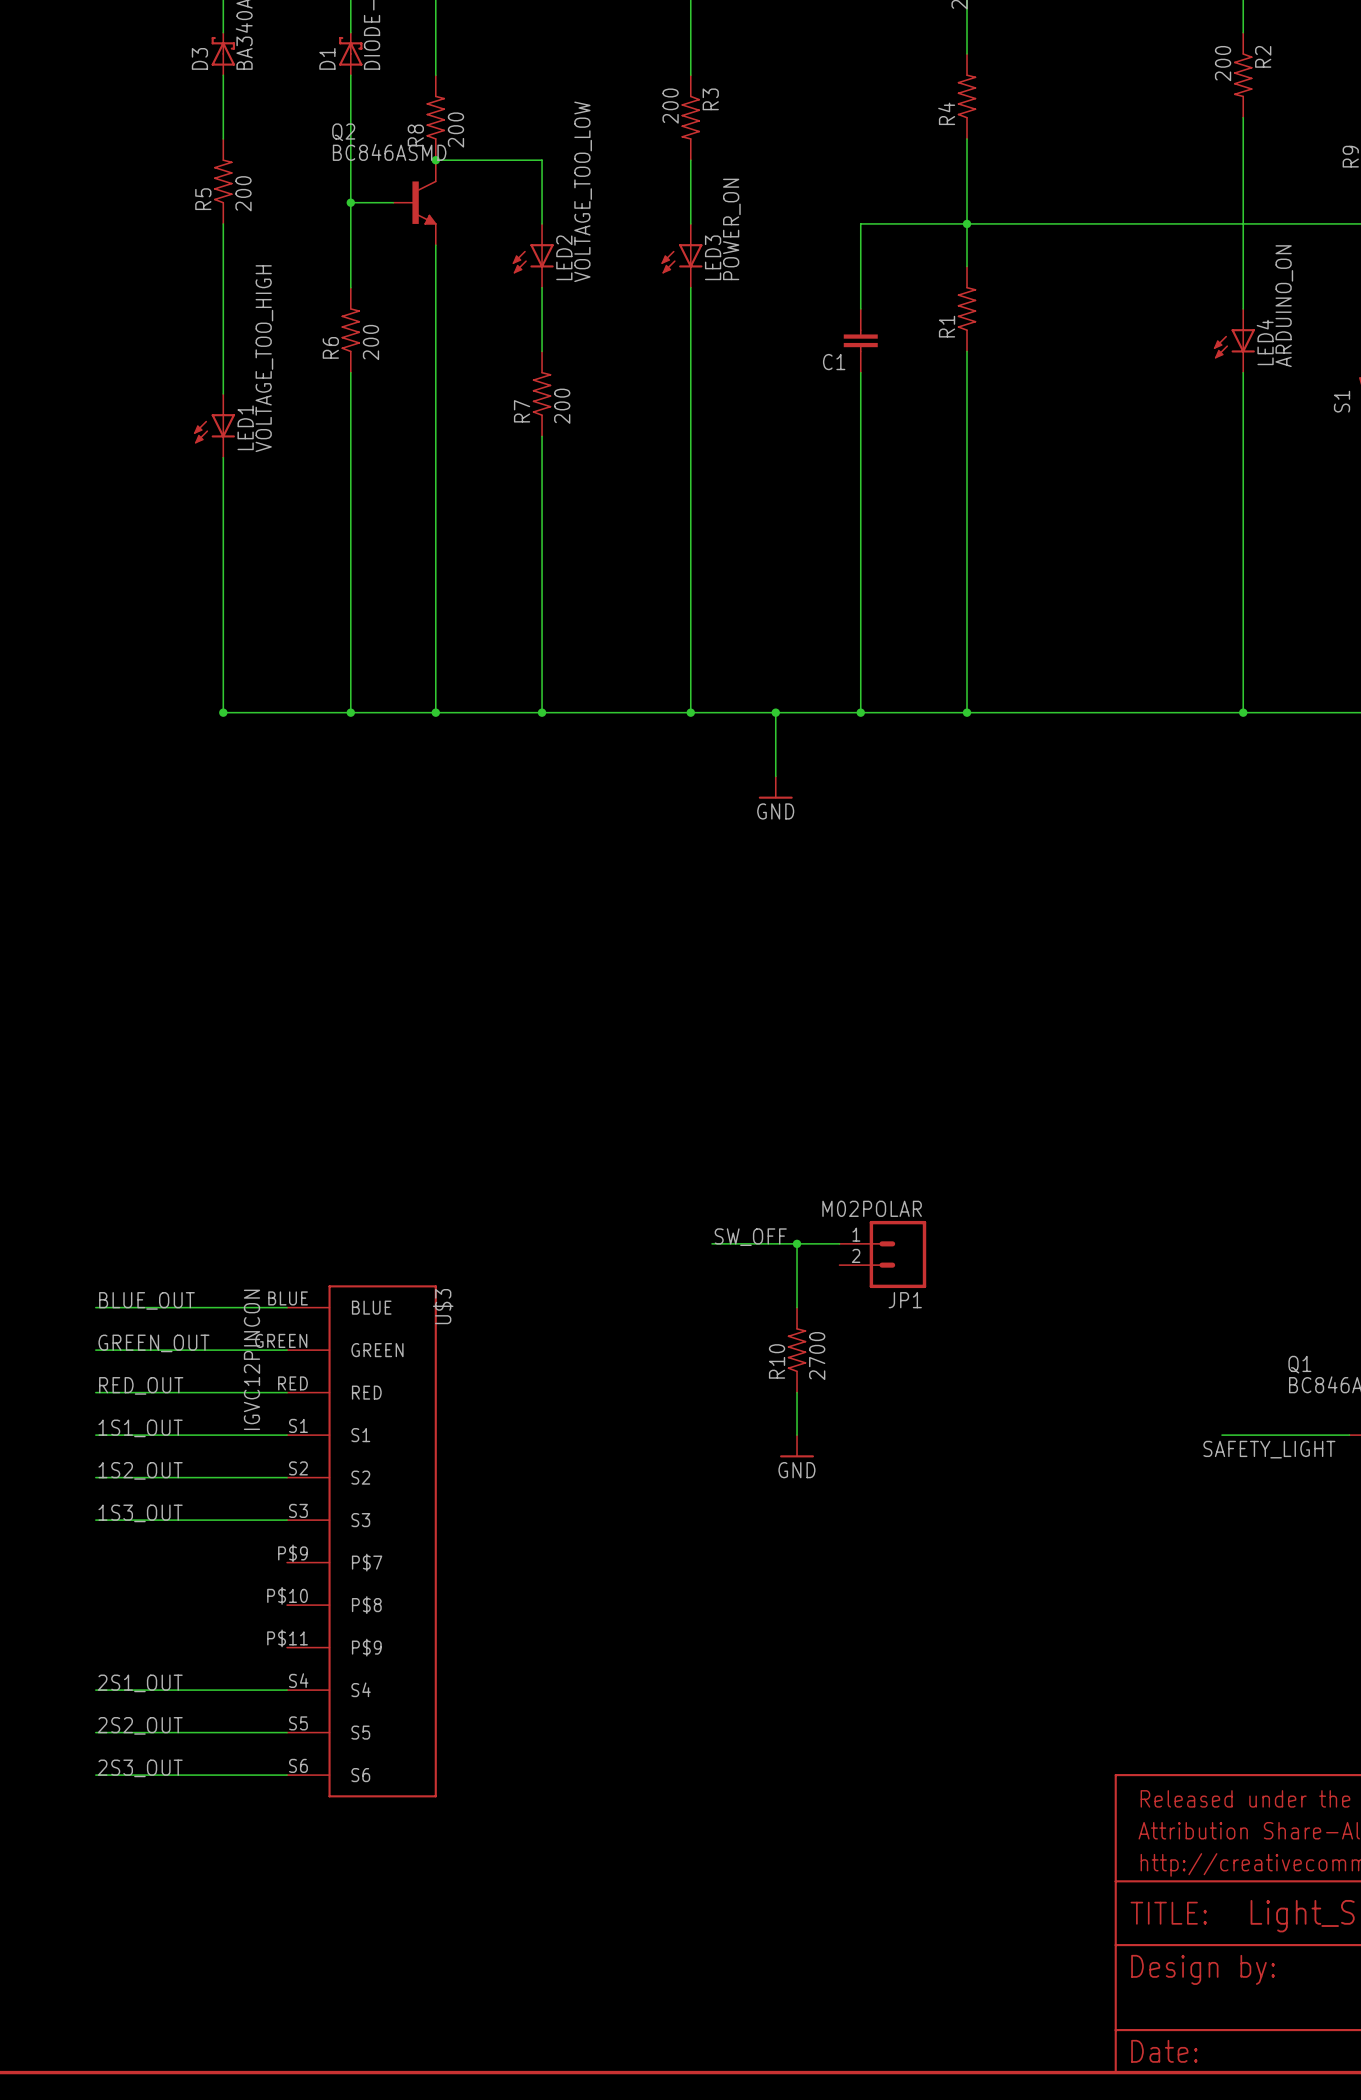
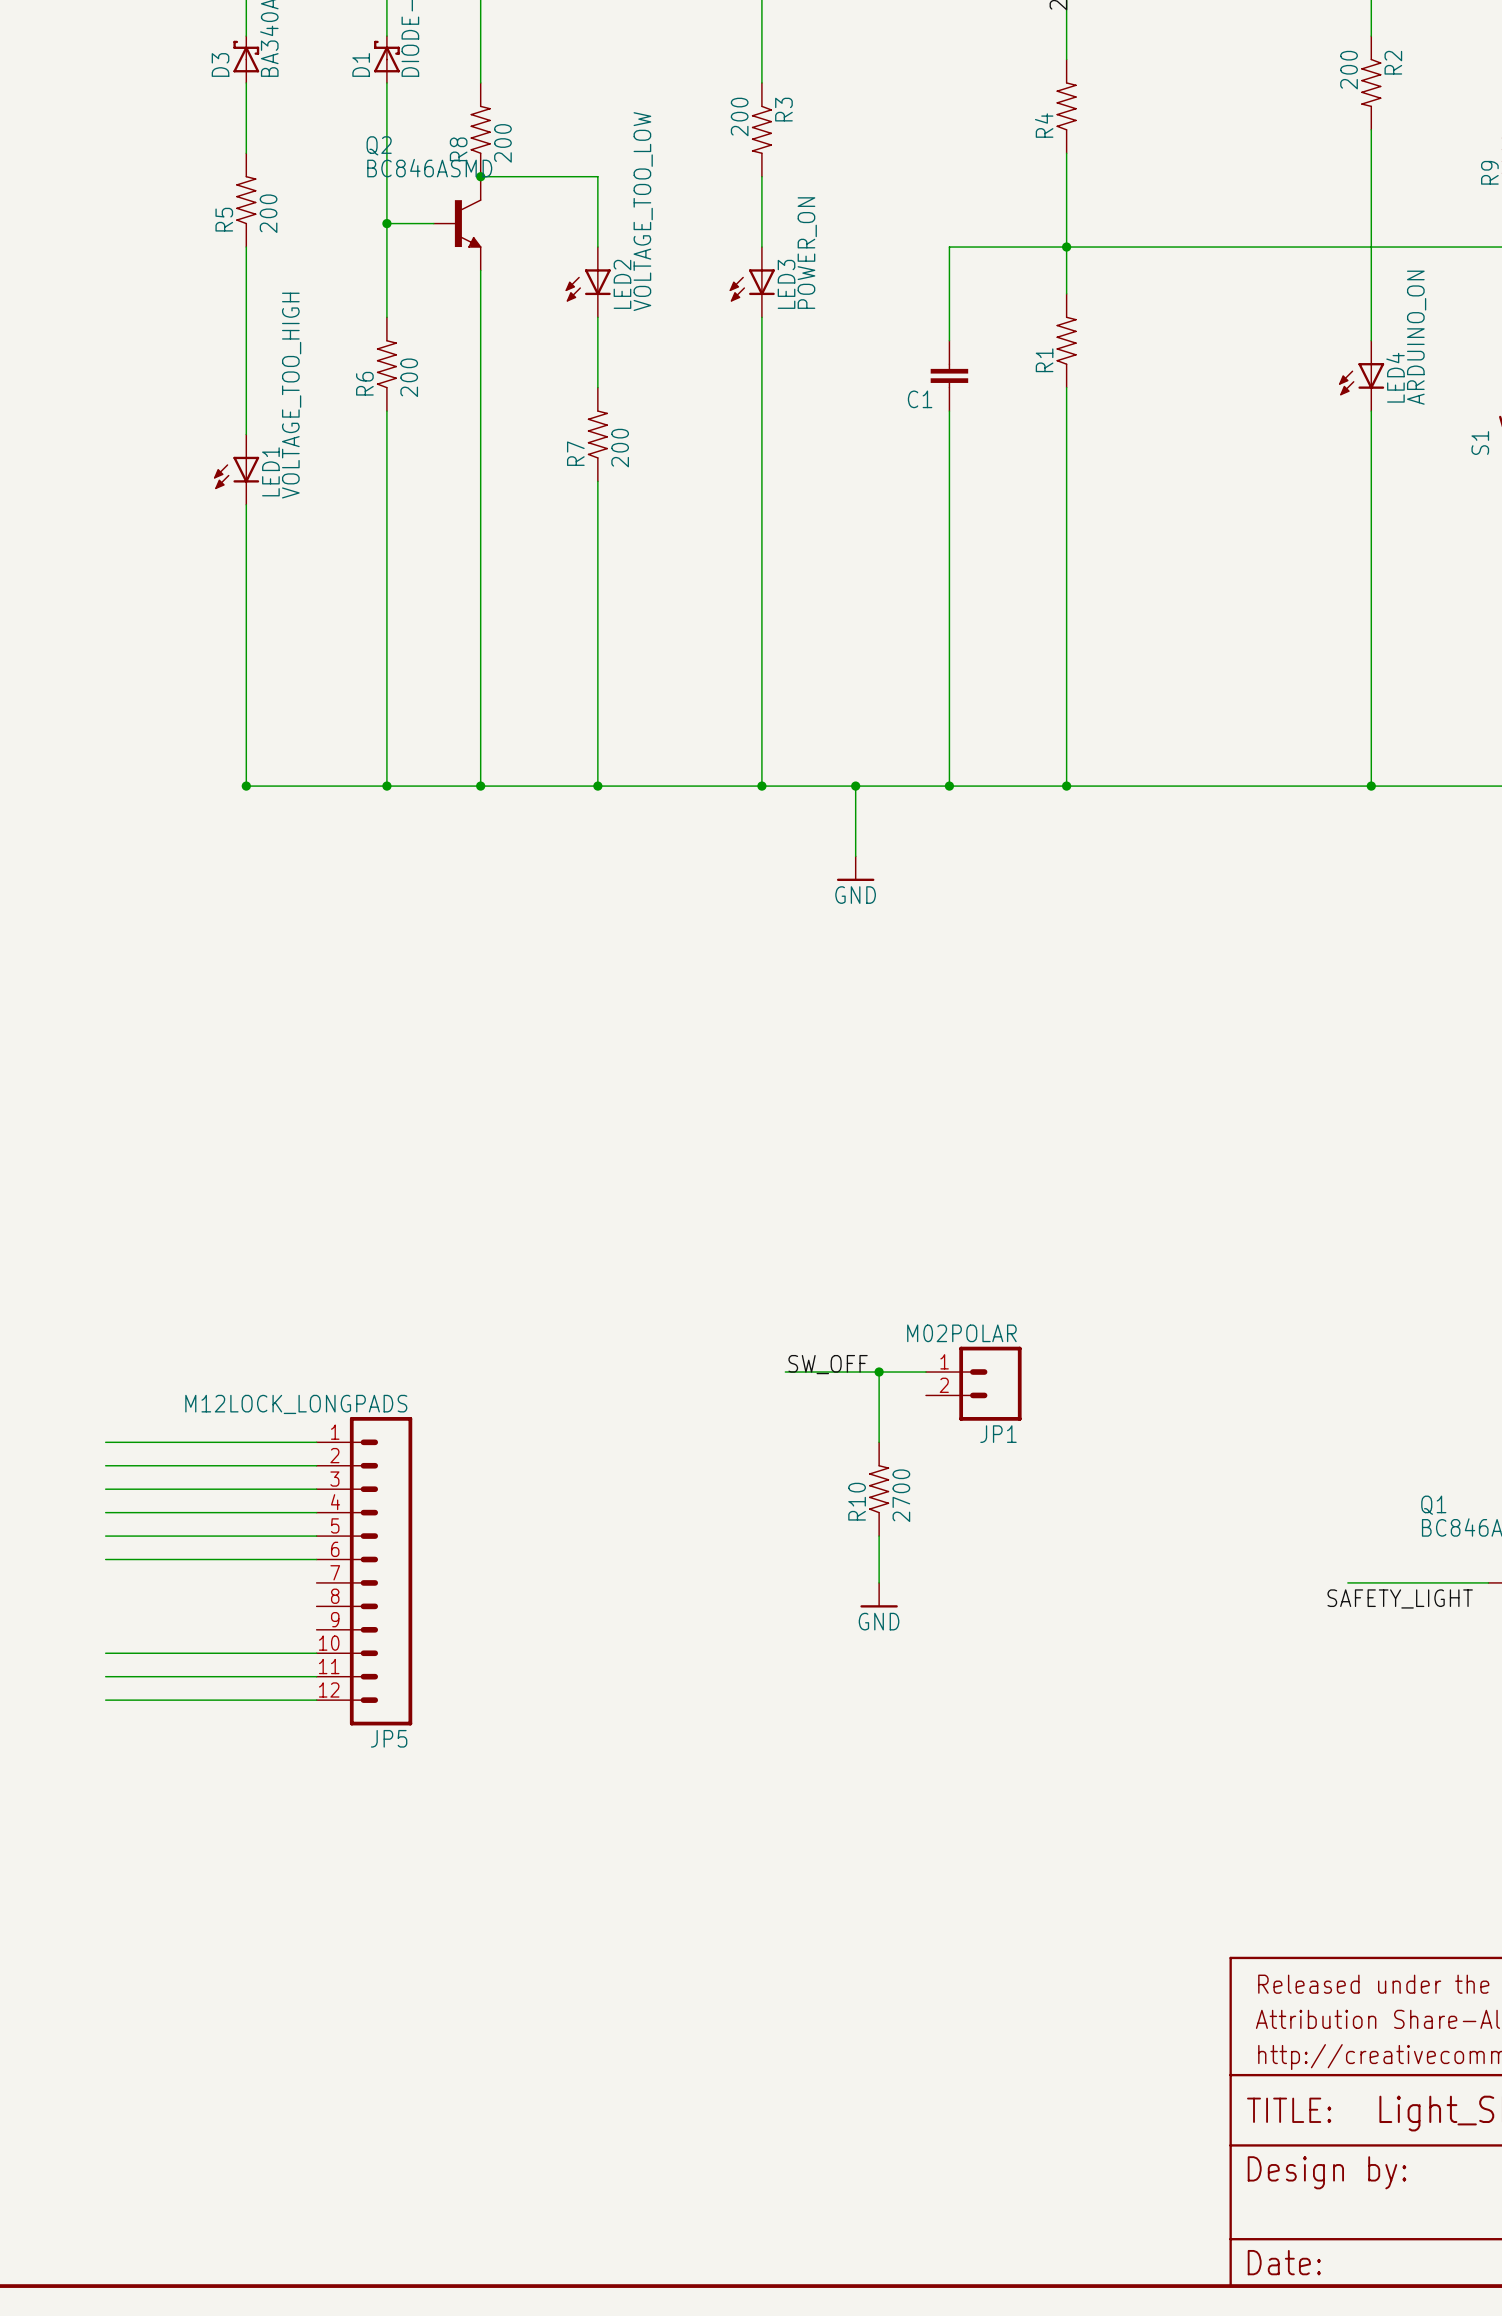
label: BLUE_OUT (146, 1300) -> none
wire: none -> (105, 1465) (316, 1465)
label: GREEN_OUT (153, 1343) -> none
label: RED_OUT (141, 1385) -> none
JP5: none -> M12LOCK_LONGPADS (364, 1571)
label: 1S1_OUT (140, 1428) -> none
wire: (95, 1435) (287, 1435) -> (105, 1512) (316, 1512)
label: 1S2_OUT (140, 1470) -> none
wire: (95, 1477) (287, 1477) -> (105, 1559) (316, 1559)
wire: none -> (105, 1653) (316, 1653)
label: 1S3_OUT (140, 1513) -> none
U$3: IGVC12PINCON (361, 1541) -> none
label: 2S1_OUT (140, 1683) -> none
wire: (95, 1690) (287, 1690) -> (105, 1700) (316, 1700)
label: 2S2_OUT (140, 1725) -> none
wire: (95, 1732) (287, 1732) -> none
label: 2S3_OUT (140, 1768) -> none
wire: (95, 1775) (287, 1775) -> none

